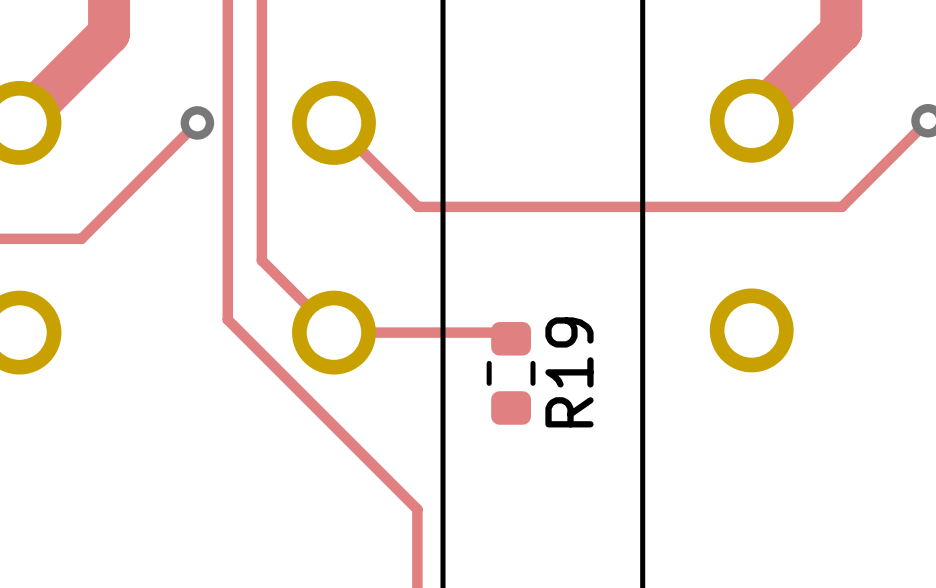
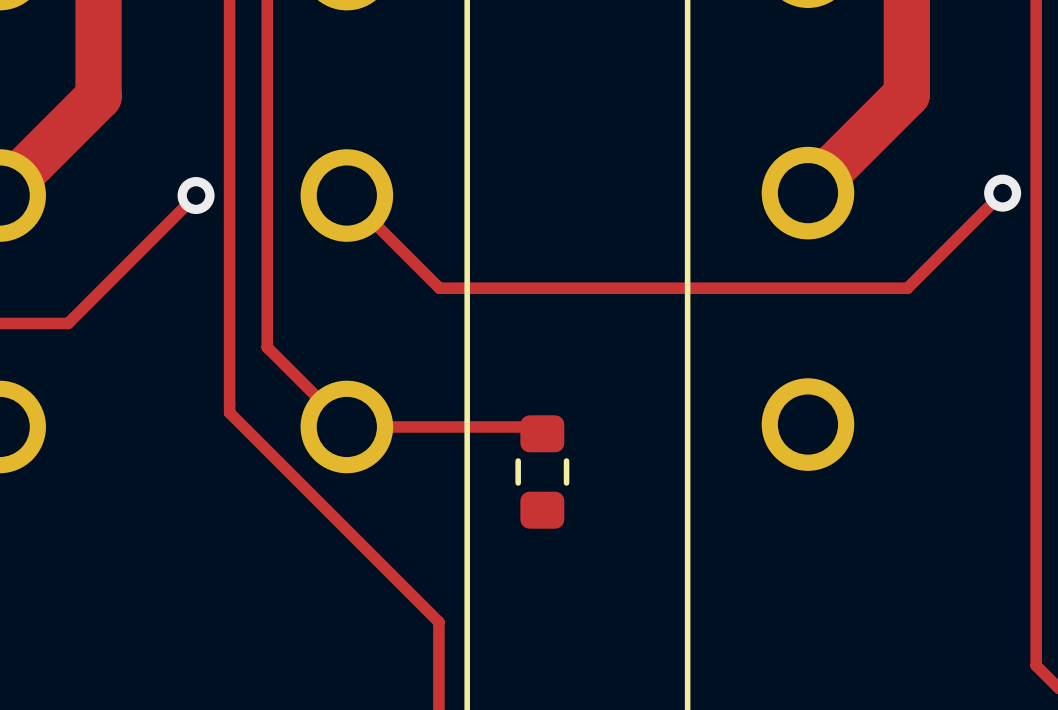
R19 name: R19 (569, 372) -> none

